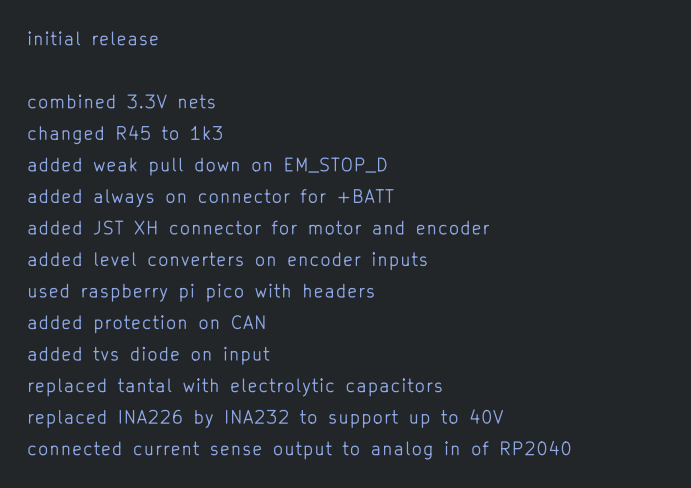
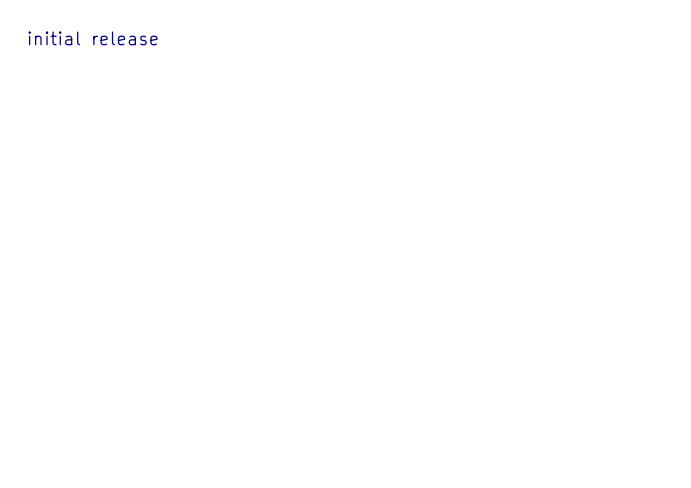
text: combined 3.3V nets (121, 101) -> none
text: changed R45 to 1k3 (125, 134) -> none
text: added weak pull down on EM_STOP_D (207, 166) -> none
text: added always on connector for +BATT (211, 198) -> none
text: added JST XH connector for motor and encoder (258, 227) -> none
text: added level converters on encoder inputs (227, 261) -> none
text: used raspberry pi pico with headers (201, 292) -> none
text: added protection on CAN (146, 324) -> none
text: added tvs diode on input (148, 355) -> none
text: replaced tantal with electrolytic capacitors (235, 387) -> none
text: replaced INA226 by INA232 to support up to 40V (265, 418) -> none
text: connected current sense output to analog in of RP2040 (299, 450) -> none

